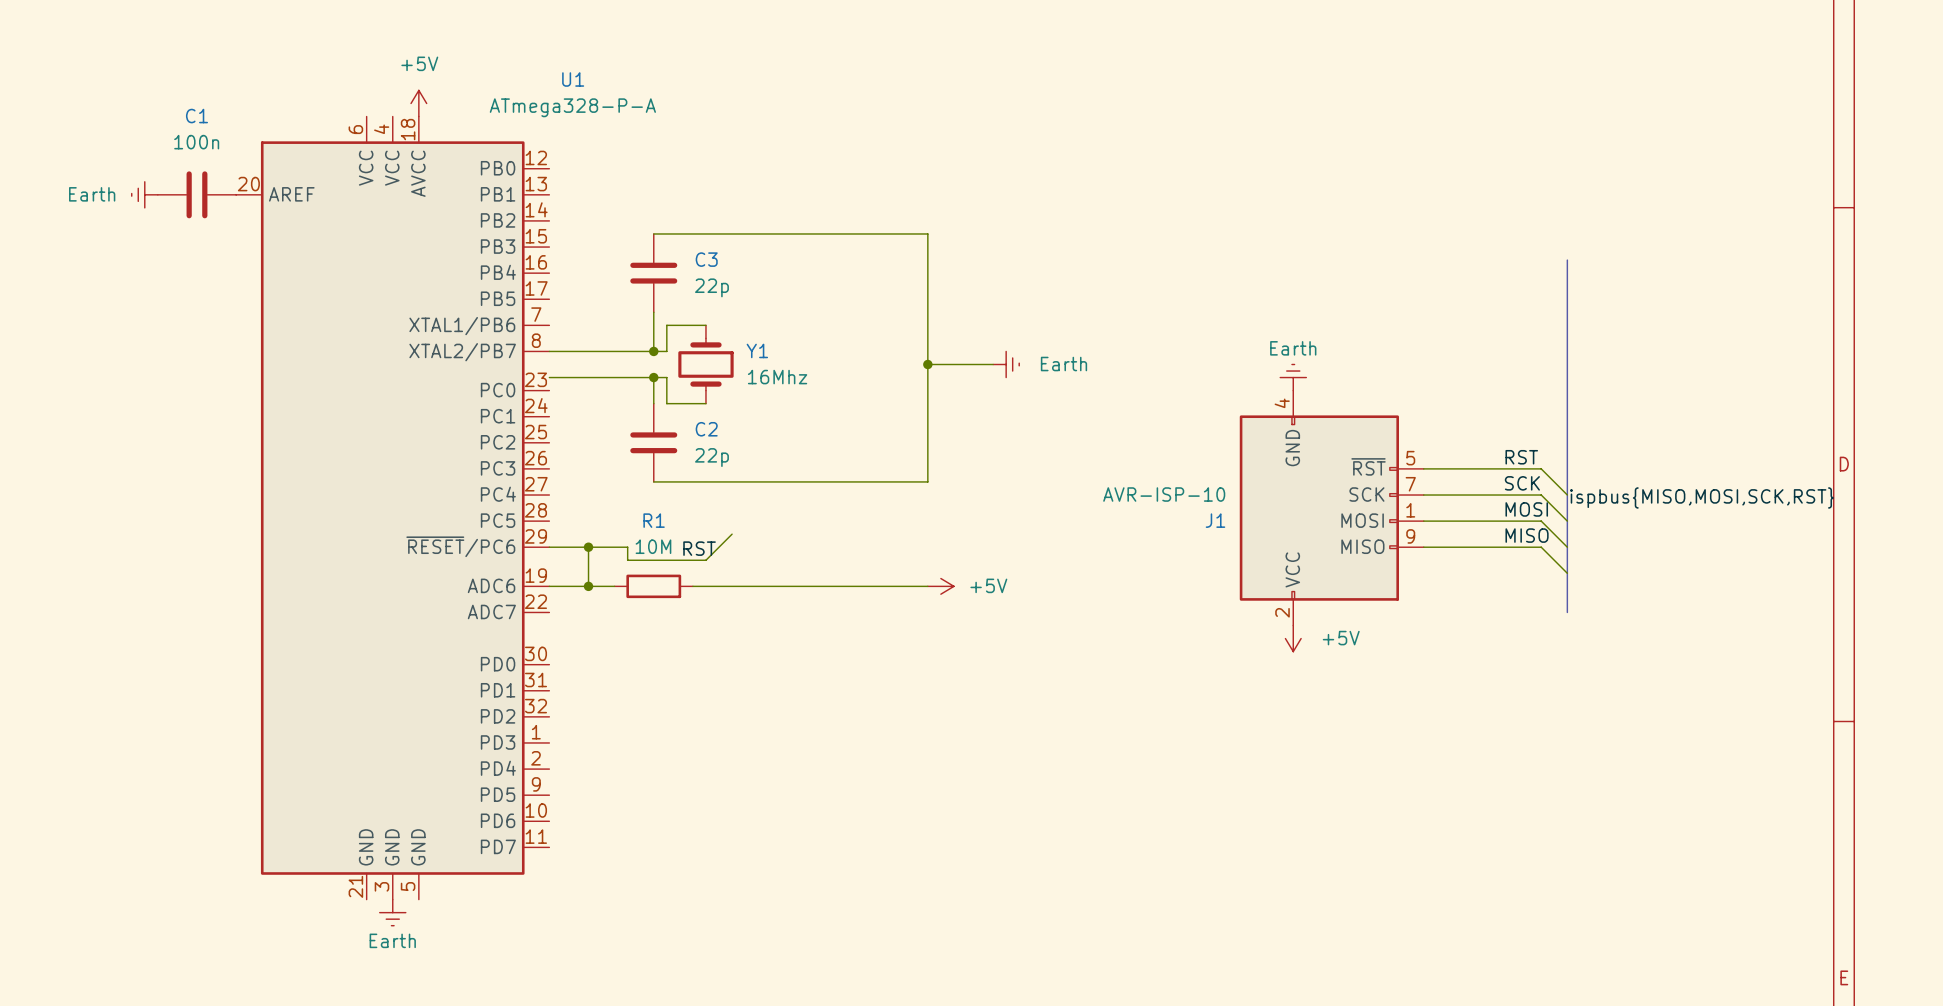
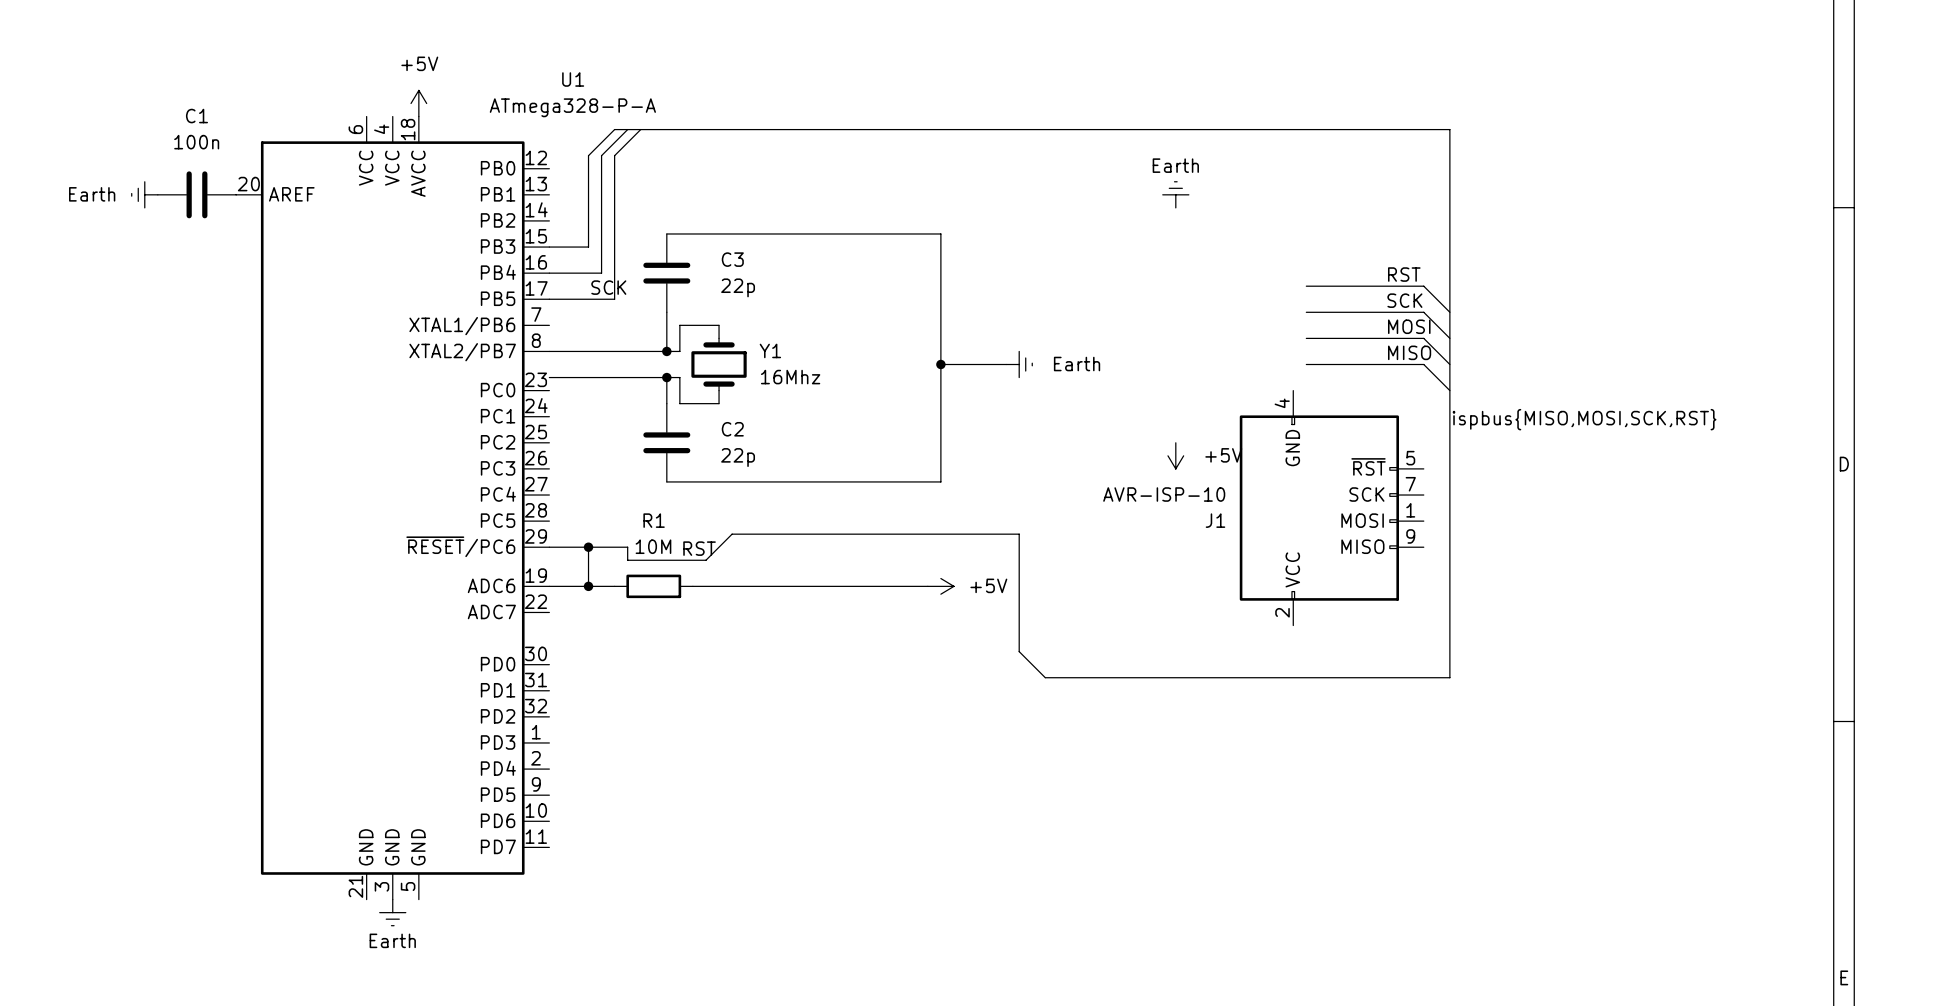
wire: none -> (614, 129) (588, 155) (588, 247) (549, 247)
bus: none -> (614, 129) (1449, 129) (1449, 677) (1045, 677)
wire: none -> (627, 129) (601, 155) (601, 273) (549, 273)
wire: none -> (640, 129) (614, 155) (614, 299) (549, 299)
power symbol: none -> Earth (1175, 194)
wire: (653, 233) (666, 233) -> (705, 325) (719, 325)
wire: (927, 233) (927, 481) -> (927, 233) (940, 233) (940, 481) (927, 481)
C3 name position: C3 (706, 259) -> C3 (732, 259)
bus: (1567, 260) (1567, 612) -> none
C3 position: (653, 273) -> (666, 273)
label: none -> SCK (608, 287)
C3 value position: 22p (711, 287) -> 22p (738, 287)
wire: (653, 312) (653, 351) -> none
wire: (666, 325) (679, 325) -> (666, 325) (666, 312)
wire: none -> (679, 325) (679, 351) (666, 351)
junction position: (653, 351) -> (666, 351)
Y1 position: (705, 364) -> (719, 364)
junction position: (927, 364) -> (940, 364)
power symbol position: Earth (1006, 364) -> Earth (1019, 364)
wire: (653, 377) (653, 403) -> none
junction position: (653, 377) -> (666, 377)
power symbol: Earth (1293, 377) -> none
wire: (666, 403) (679, 403) -> (666, 377) (679, 377) (679, 403)
C2 name position: C2 (706, 429) -> C2 (732, 429)
C2 position: (653, 442) -> (666, 442)
C2 value position: 22p (711, 457) -> 22p (738, 457)
label position: RST (1521, 457) -> RST (1404, 274)
wire: (1423, 468) (1541, 468) (1567, 495) -> (1306, 286) (1423, 286) (1449, 312)
wire: (653, 481) (666, 481) -> (705, 403) (719, 403)
label position: SCK (1522, 483) -> SCK (1404, 300)
wire: (1423, 495) (1541, 495) (1567, 521) -> (1306, 312) (1423, 312) (1449, 338)
label position: ispbus{MISO,MOSI,SCK,RST} (1701, 497) -> ispbus{MISO,MOSI,SCK,RST} (1584, 419)
label position: MOSI (1526, 509) -> MOSI (1409, 326)
wire: (1423, 521) (1541, 521) (1567, 547) -> (1306, 338) (1423, 338) (1449, 364)
wire: none -> (732, 534) (1019, 534) (1019, 651) (1045, 677)
label position: MISO (1527, 535) -> MISO (1409, 352)
wire: (1423, 547) (1541, 547) (1567, 573) -> (1306, 364) (1423, 364) (1449, 390)
power symbol position: +5V (1293, 638) -> +5V (1175, 455)

